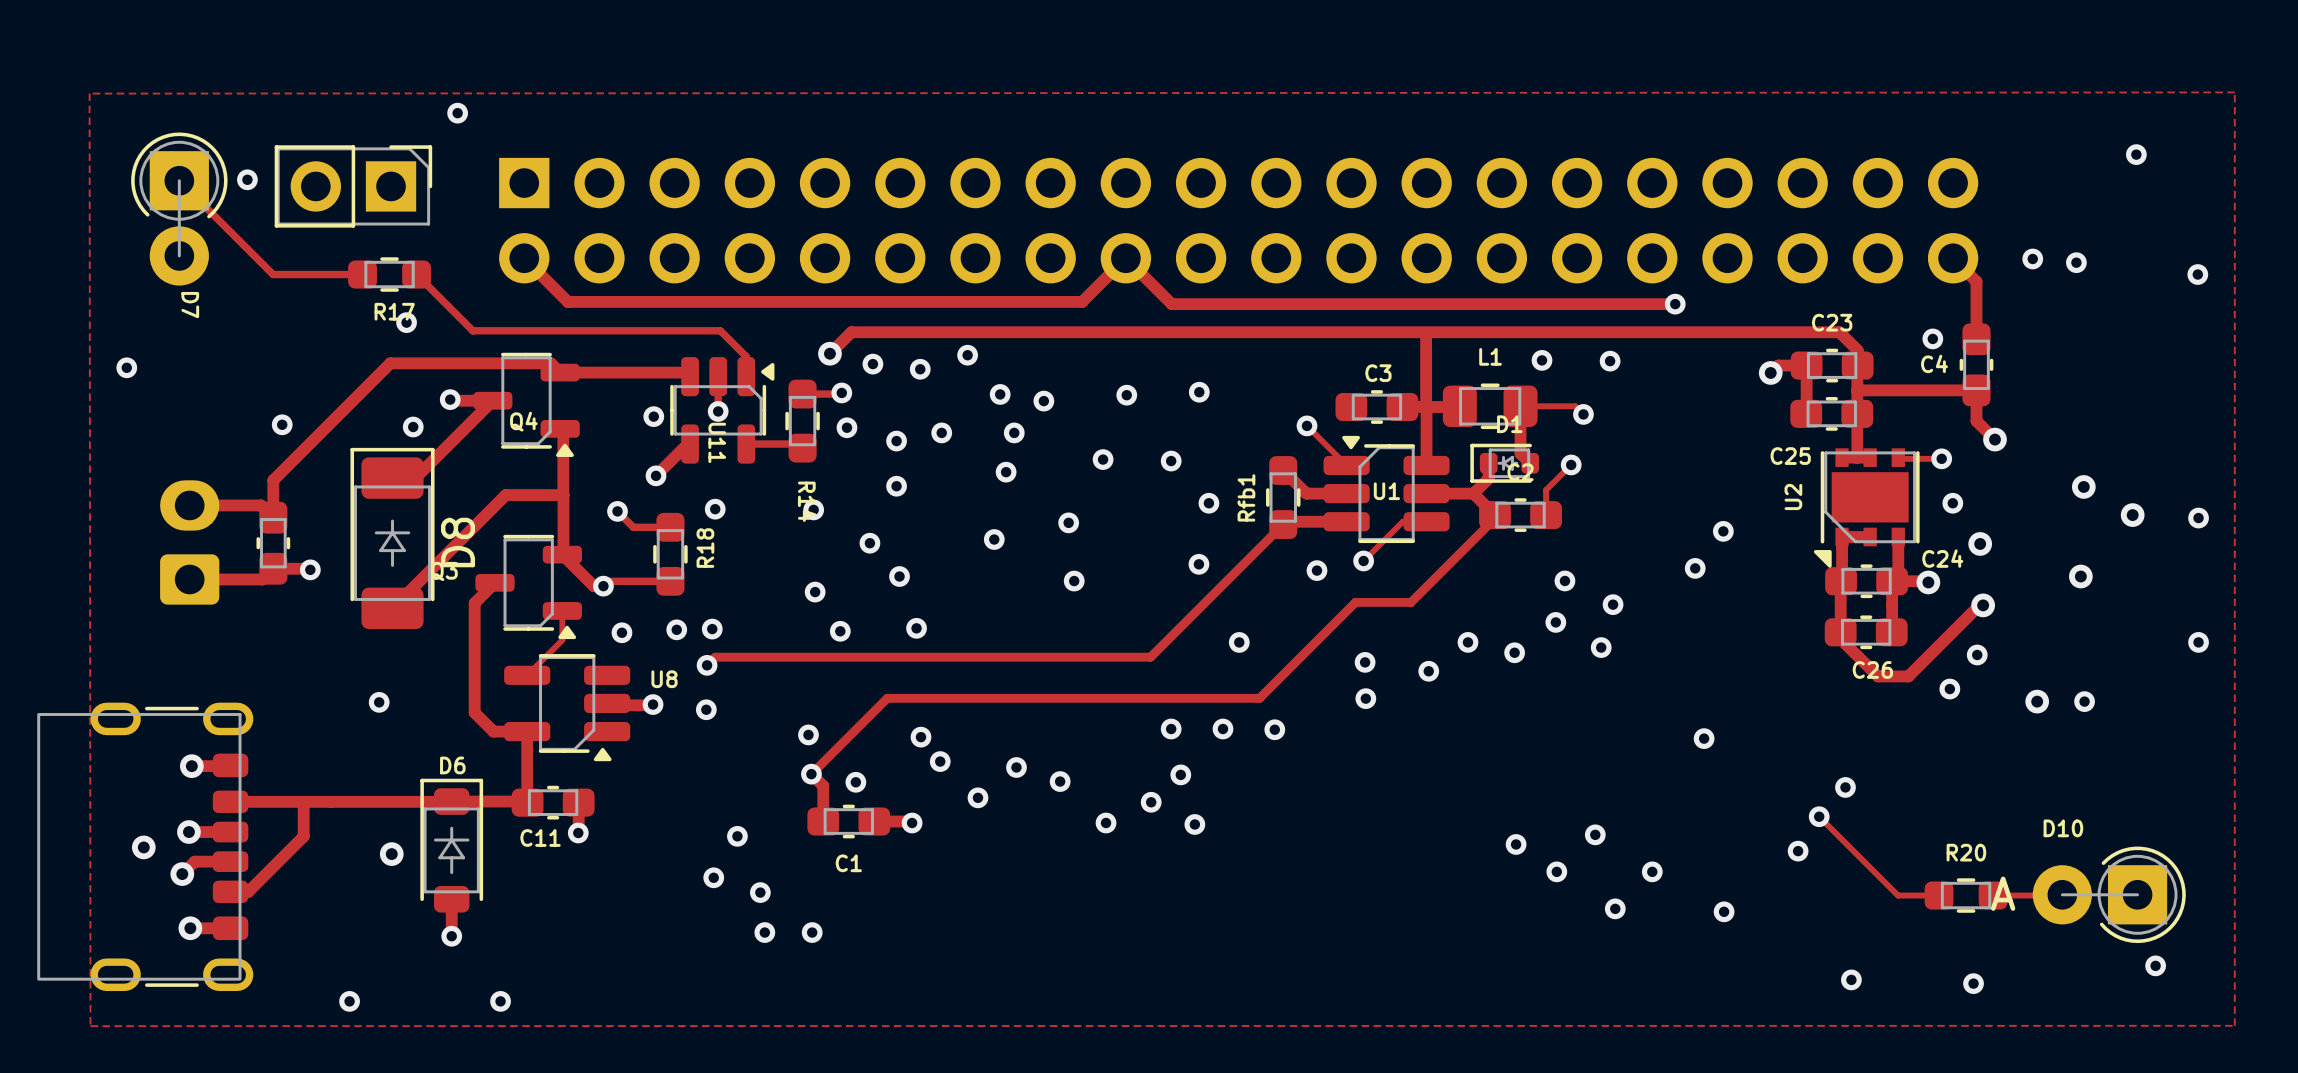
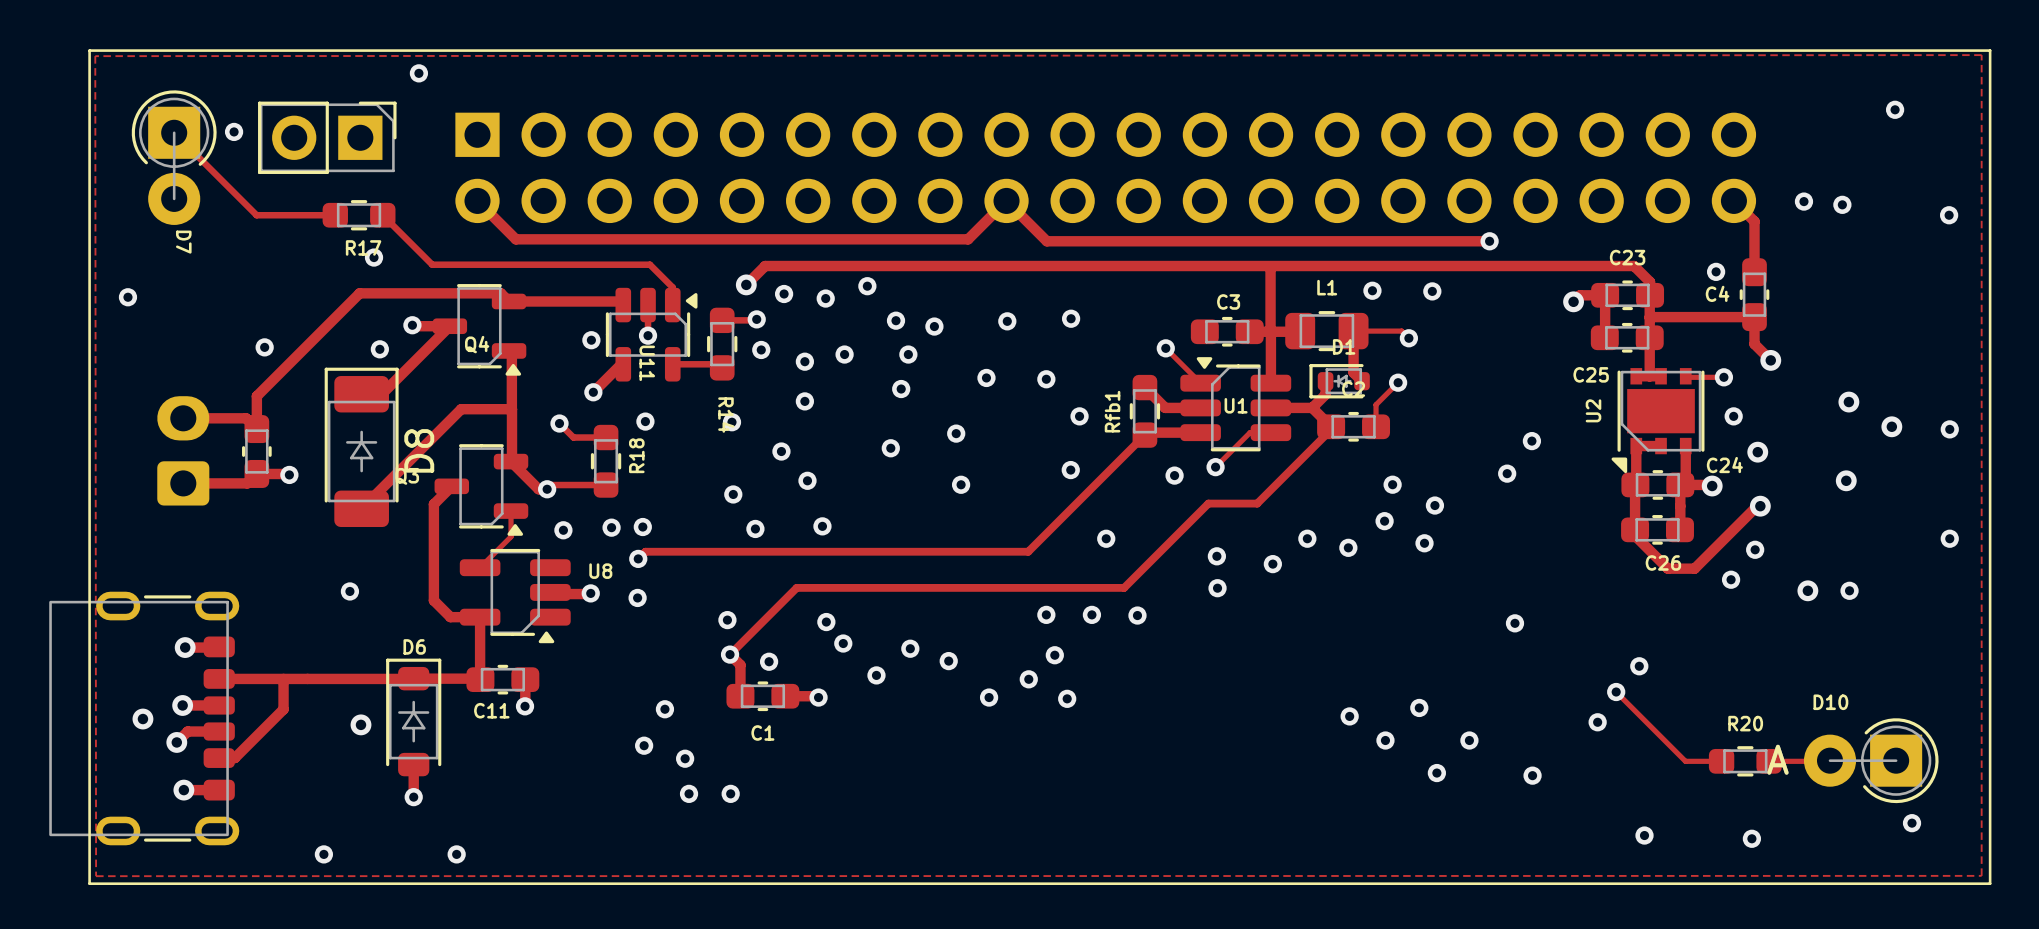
line: none -> (89, 50) (1990, 50) (1990, 883) (89, 883) (89, 50)

